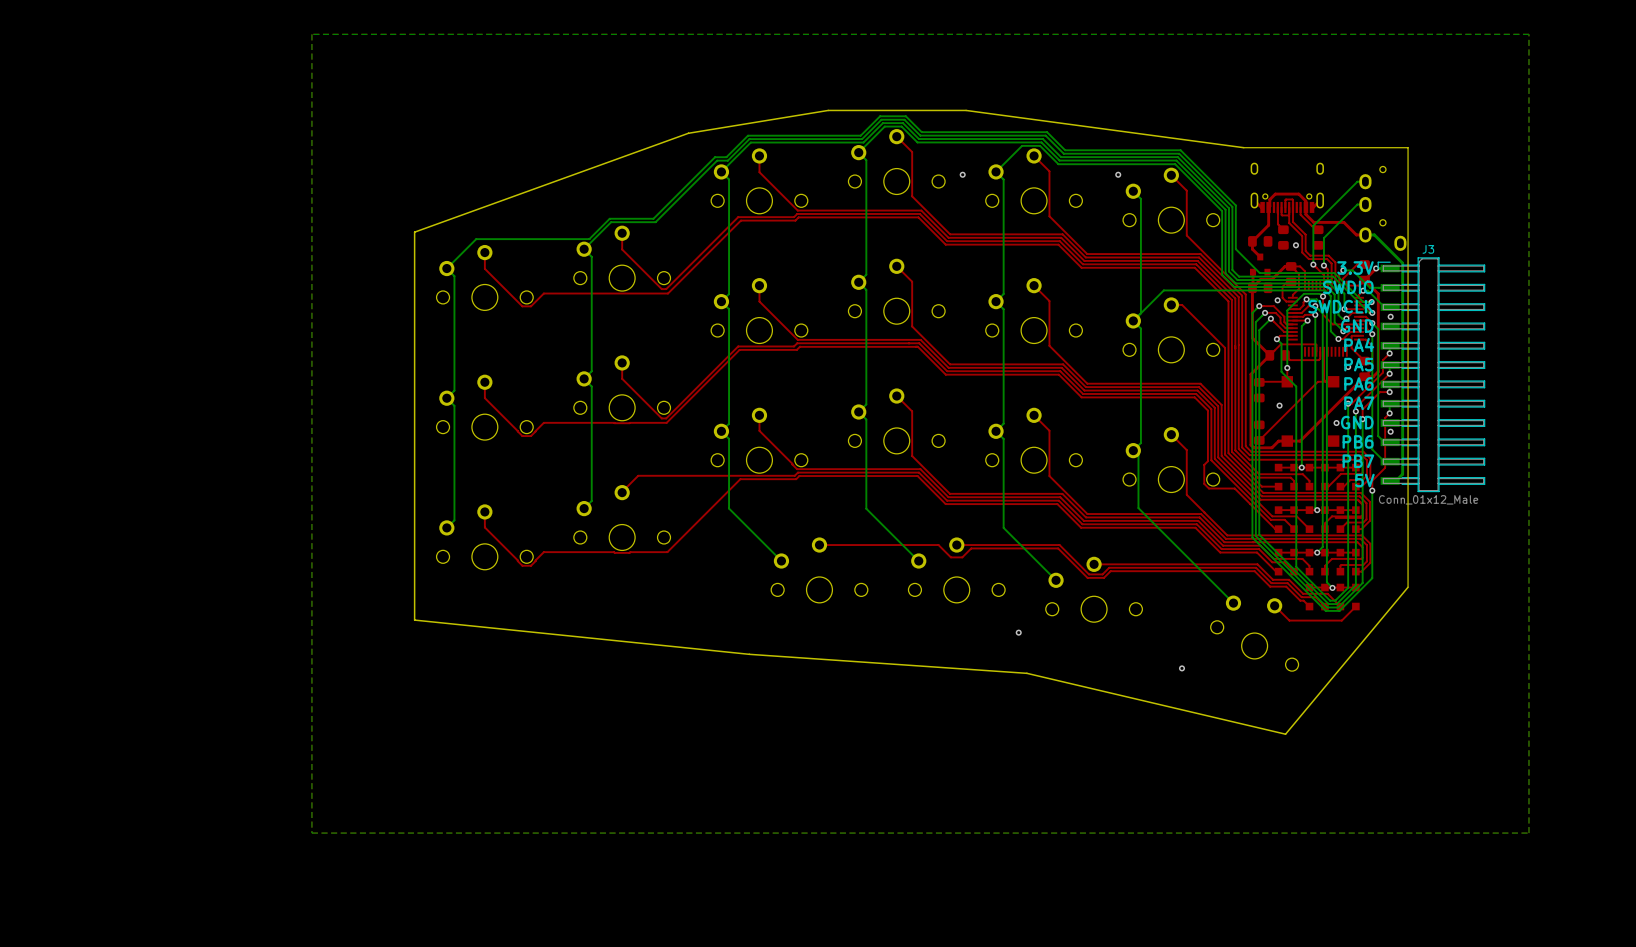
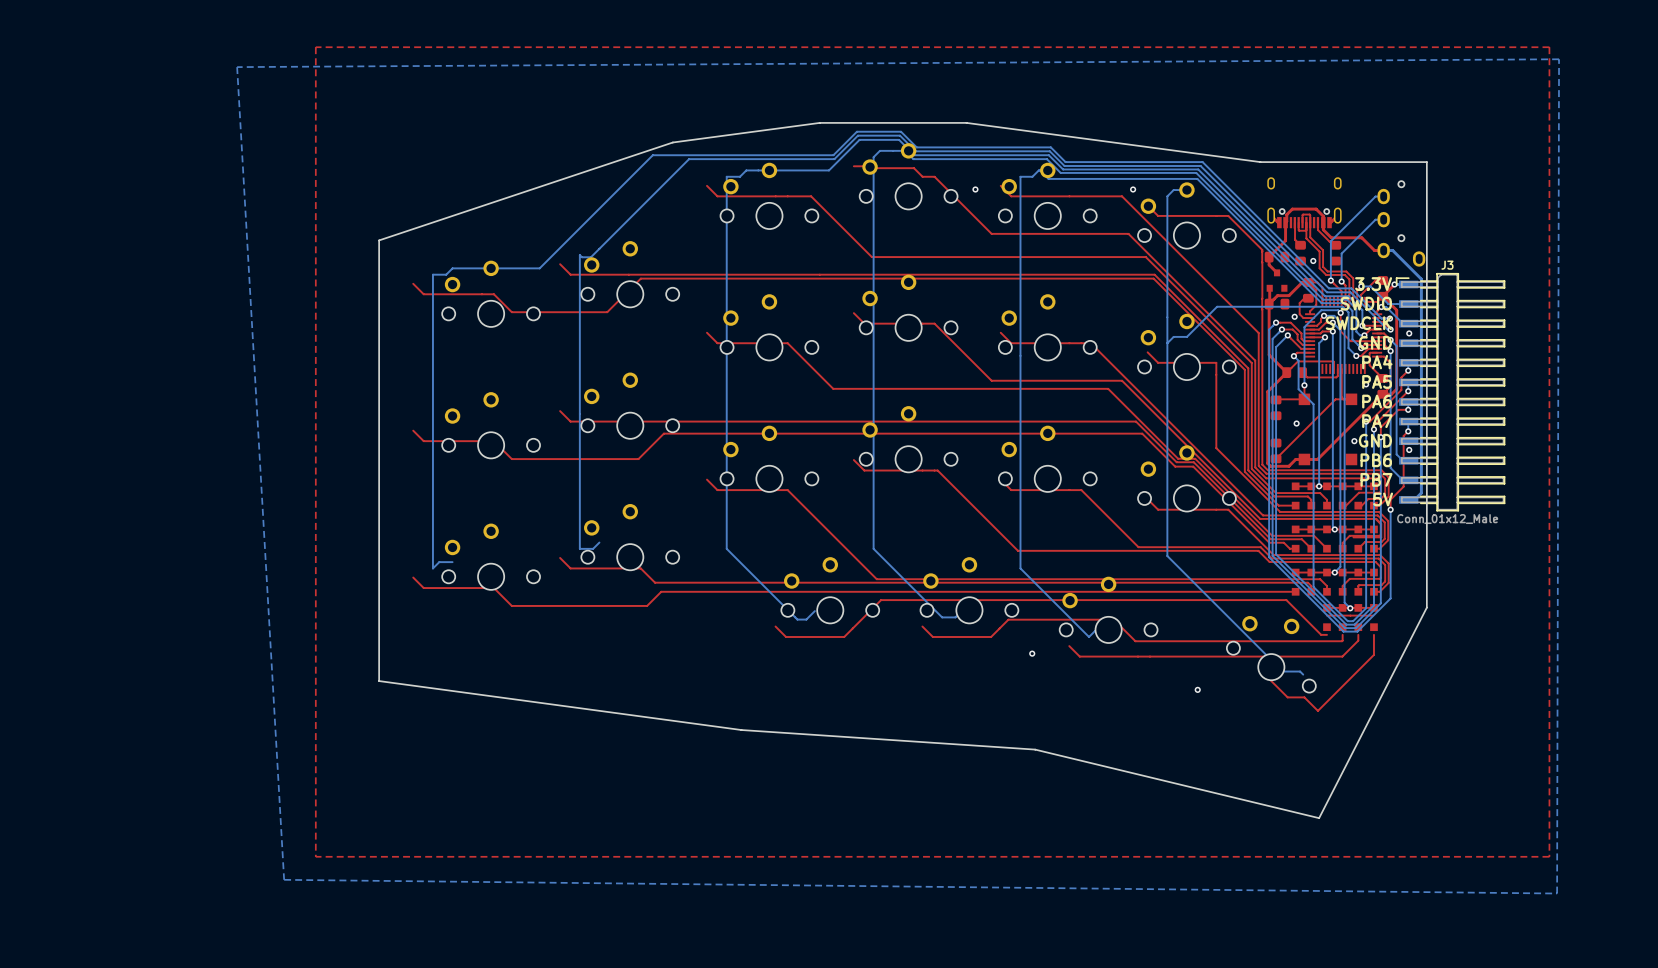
bottom zone outline: (1528, 34) (1528, 833) (311, 833) (311, 34) (1528, 34) -> (1559, 59) (1557, 893) (284, 879) (237, 67) (1559, 59)
top track: (896, 136) (912, 152) (912, 196) (950, 234) (1062, 234) (1085, 257) (1199, 257) (1238, 297) (1238, 343) -> (853, 166) (913, 168) (922, 176) (934, 176) (991, 233) (1128, 233) (1255, 360)
bottom track: (1042, 139) (918, 139) (903, 123) (882, 123) (863, 142) (750, 142) (721, 171) (729, 179) (729, 294) (721, 301) (729, 309) (729, 423) (721, 431) (729, 438) (729, 508) (781, 560) -> (1056, 153) (1050, 147) (916, 147) (901, 131) (856, 131) (833, 155) (652, 155) (539, 268) (452, 268) (446, 274) (432, 274) (432, 568) (439, 562) (452, 562)
bottom track: (1041, 142) (917, 142) (901, 126) (884, 126) (858, 152) (866, 160) (866, 274) (858, 282) (866, 289) (866, 404) (858, 411) (866, 419) (866, 508) (918, 561) -> (1055, 156) (1049, 151) (915, 151) (900, 135) (857, 135) (834, 159) (689, 159) (590, 257) (582, 257) (579, 255) (579, 548) (593, 548) (599, 542)
bottom track: (1040, 145) (1022, 145) (996, 171) (1003, 179) (1003, 294) (996, 301) (1003, 309) (1003, 423) (996, 431) (1003, 438) (1003, 527) (1056, 580) -> (1053, 160) (1048, 155) (914, 155) (899, 139) (859, 139) (829, 170) (746, 170) (739, 176) (726, 176) (726, 548) (797, 619) (806, 619) (814, 611)
bottom track: (1051, 147) (1061, 157) (1177, 157) (1228, 208) (1228, 271) (1237, 280) (1307, 280) -> (1065, 162) (1202, 162) (1328, 288) (1352, 289)
board edge: (1243, 147) (966, 110) (828, 110) (688, 133) (414, 232) (414, 620) (749, 654) (1026, 673) (1285, 734) (1408, 587) -> (1260, 162) (966, 122) (819, 122) (672, 142) (379, 240) (379, 681) (741, 730) (1035, 749) (1319, 818) (1426, 607)
bottom track: (1050, 151) (1059, 160) (1176, 160) (1225, 209) (1225, 273) (1235, 283) (1305, 283) -> (1064, 166) (1200, 166) (1326, 292) (1350, 292)
bottom track: (1049, 154) (1058, 164) (1175, 164) (1222, 211) (1222, 274) (1234, 287) (1304, 286) -> (1063, 169) (1198, 169) (1325, 296)
top track: (759, 155) (759, 172) (797, 210) (921, 210) (948, 237) (1061, 237) (1084, 260) (1197, 260) (1235, 298) (1235, 345) -> (706, 185) (717, 196) (811, 196) (871, 257) (1145, 257) (1251, 363)
top track: (1034, 155) (1049, 171) (1049, 216) (1087, 254) (1200, 254) (1242, 295) (1242, 316) -> (1000, 185) (1011, 196) (1122, 196) (1258, 333)
top track: (1171, 175) (1186, 190) (1186, 235) (1245, 294) -> (1147, 205) (1158, 215) (1228, 215) (1262, 249) (1262, 310)
bottom track: none -> (1186, 190) (1173, 190) (1167, 196) (1167, 556) (1282, 671) (1300, 671) (1303, 674)
bottom track: (1133, 191) (1140, 198) (1140, 313) -> none
top track: (622, 233) (622, 249) (661, 289) (666, 289) (738, 217) (794, 217) (797, 213) (919, 213) (947, 241) (1059, 241) (1082, 264) (1196, 264) (1231, 299) (1231, 351) -> (560, 264) (570, 274) (1154, 274) (1248, 368)
top track: (484, 252) (484, 268) (522, 306) (531, 306) (543, 293) (668, 293) (740, 220) (795, 220) (798, 217) (918, 217) (945, 244) (1058, 244) (1081, 267) (1194, 267) -> none
top track: (896, 266) (912, 281) (912, 326) (950, 364) (1063, 364) (1085, 387) (1199, 387) (1218, 406) (1218, 457) (1260, 499) -> (853, 313) (864, 323) (934, 323) (991, 380) (1122, 380) (1260, 518) (1277, 518)
top track: (1194, 267) (1228, 301) (1228, 352) -> (413, 283) (423, 294) (493, 294) (511, 312) (607, 312) (640, 278) (1153, 278) (1244, 369)
bottom track: (1334, 273) (1259, 273) (1235, 249) (1235, 205) (1180, 150) (1065, 150) (1047, 132) (921, 132) (905, 116) (880, 116) (860, 135) (748, 135) (726, 157) (715, 157) (653, 218) (609, 218) (589, 239) (476, 239) (446, 268) (454, 276) (454, 390) (446, 398) (454, 405) (454, 520) (446, 527) -> none
bottom track: (1333, 276) (1239, 276) (1232, 269) (1232, 206) (1179, 153) (1063, 153) (1045, 135) (920, 135) (904, 119) (881, 119) (862, 139) (749, 139) (727, 160) (717, 160) (655, 222) (611, 222) (584, 249) (591, 256) (591, 371) (584, 378) (591, 386) (591, 500) (584, 508) -> none
bottom track: none -> (1323, 299) (1196, 172) (1060, 172) (1046, 159) (913, 159) (905, 150) (879, 150) (873, 157) (873, 548) (942, 617) (955, 617) (961, 611)
top track: (759, 285) (759, 301) (797, 339) (920, 339) (948, 367) (1061, 367) (1084, 390) (1197, 390) (1214, 407) (1214, 458) (1272, 516) -> (706, 332) (717, 343) (787, 343) (833, 388) (1108, 388) (1178, 458) (1195, 458) (1272, 535) (1289, 535)
top track: (1034, 285) (1049, 301) (1049, 345) (1087, 383) (1200, 383) (1221, 404) (1221, 456) (1261, 496) -> (1000, 332) (1011, 343) (1090, 343) (1263, 515) (1278, 515)
bottom track: none -> (1321, 303) (1197, 178) (1048, 178) (1040, 170) (1032, 176) (1020, 176) (1020, 568) (1089, 636) (1095, 630) (1108, 630)
bottom track: (1201, 290) (1163, 290) (1133, 320) (1140, 328) (1140, 443) (1133, 450) (1138, 455) (1138, 508) (1233, 603) -> (1217, 306) (1186, 336) (1173, 336) (1167, 343)
top track: (1171, 304) (1182, 304) (1225, 347) (1225, 454) -> (1147, 352) (1158, 362) (1216, 362) (1216, 448) (1241, 473)
top track: (622, 362) (622, 378) (661, 418) (666, 418) (738, 346) (794, 346) (797, 343) (919, 343) (947, 371) (1060, 371) (1083, 393) (1196, 393) (1211, 409) (1211, 460) (1270, 519) -> (560, 411) (570, 421) (1136, 421) (1176, 462) (1193, 462) (1270, 539) (1287, 539)
top track: (484, 381) (484, 398) (522, 436) (531, 436) (543, 422) (666, 422) (739, 349) (796, 349) (800, 346) (917, 346) (945, 374) (1058, 374) (1081, 397) (1194, 397) (1207, 410) (1207, 461) (1204, 464) (1204, 483) (1208, 488) (1234, 488) (1275, 529) -> (413, 430) (423, 441) (493, 441) (511, 459) (638, 459) (663, 433) (1142, 433) (1175, 466) (1193, 466) (1269, 542) (1283, 542) (1292, 548)
top track: (896, 396) (912, 411) (912, 456) (949, 493) (1062, 493) (1086, 517) (1199, 517) (1224, 542) (1252, 542) -> (853, 460) (864, 470) (937, 470) (1017, 550) (1258, 550) (1269, 562)
top track: (759, 414) (759, 430) (797, 469) (920, 469) (948, 497) (1060, 497) (1083, 520) (1198, 520) (1223, 545) (1260, 545) (1273, 558) (1302, 559) -> (706, 479) (717, 490) (787, 490) (876, 579) (1320, 579)
top track: (1034, 415) (1049, 430) (1049, 476) (1087, 514) (1201, 514) (1225, 538) (1255, 538) -> (1000, 479) (1011, 490) (1081, 490) (1138, 547) (1260, 547) (1272, 558)
top track: (1171, 434) (1186, 450) (1186, 494) (1227, 535) (1256, 535) -> (1147, 499) (1158, 509) (1228, 509) (1273, 555)
top track: (622, 491) (638, 475) (794, 475) (797, 472) (919, 472) (947, 500) (1058, 500) (1082, 524) (1196, 524) (1221, 549) (1259, 549) (1272, 562) (1284, 562) (1294, 571) -> (560, 557) (570, 568) (640, 568) (655, 582) (1307, 582) (1311, 586) (1311, 591)
top track: (484, 511) (484, 527) (522, 565) (531, 565) (543, 552) (667, 552) (740, 479) (796, 479) (799, 476) (917, 476) (945, 504) (1057, 504) (1081, 527) (1195, 527) (1220, 552) (1257, 552) (1276, 571) -> (413, 577) (423, 588) (493, 588) (511, 605) (647, 605) (661, 591) (1293, 591)
top track: (819, 545) (938, 545) (950, 557) (962, 557) (971, 548) (1058, 548) (1087, 577) (1103, 577) (1110, 571) (1254, 571) (1270, 586) (1286, 586) (1300, 600) (1303, 600) (1309, 606) -> none
top track: (956, 545) (1059, 545) (1088, 574) (1102, 574) (1109, 567) (1256, 567) (1271, 583) (1287, 583) (1301, 597) (1315, 597) (1324, 606) -> none
top track: (1094, 564) (1257, 564) (1272, 579) (1289, 579) (1303, 593) (1327, 593) (1340, 606) -> none
top track: none -> (1373, 615) (1326, 615)
top track: none -> (775, 626) (786, 636) (844, 636) (881, 600) (1286, 600) (1321, 634) (1326, 634)
top track: none -> (922, 626) (932, 636) (991, 636) (1008, 619) (1113, 619) (1135, 641) (1342, 641) (1342, 634)
top track: (1274, 605) (1289, 620) (1341, 620) (1355, 606) -> none
top track: none -> (1358, 634) (1358, 640) (1342, 656) (1079, 656) (1069, 646)
top track: none -> (1373, 634) (1373, 654) (1317, 710) (1304, 697) (1287, 697) (1261, 670)

